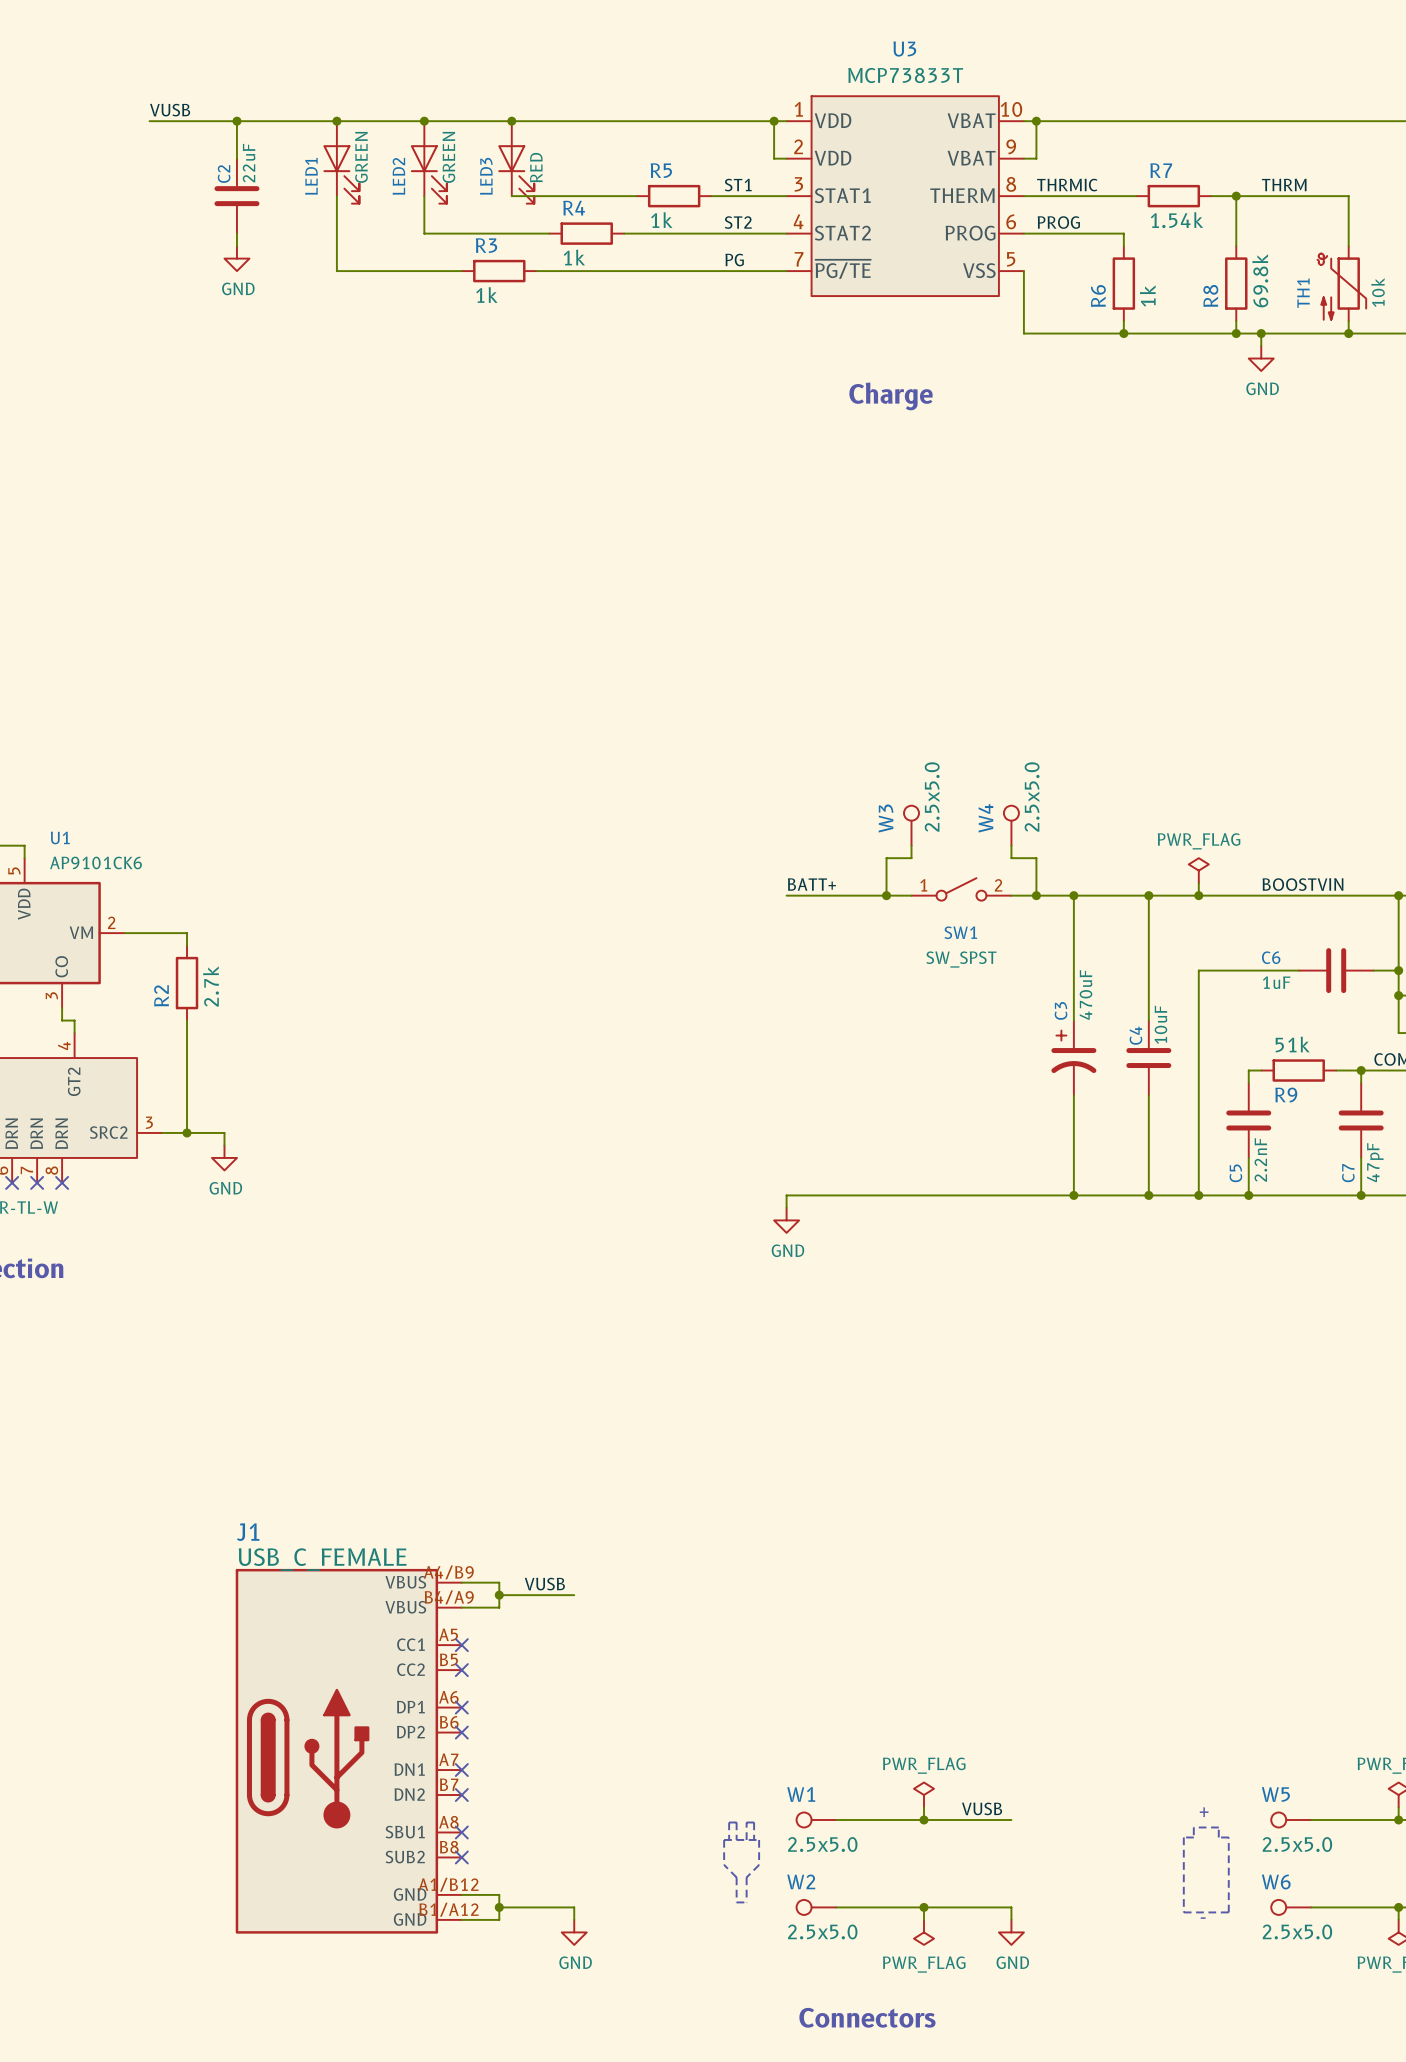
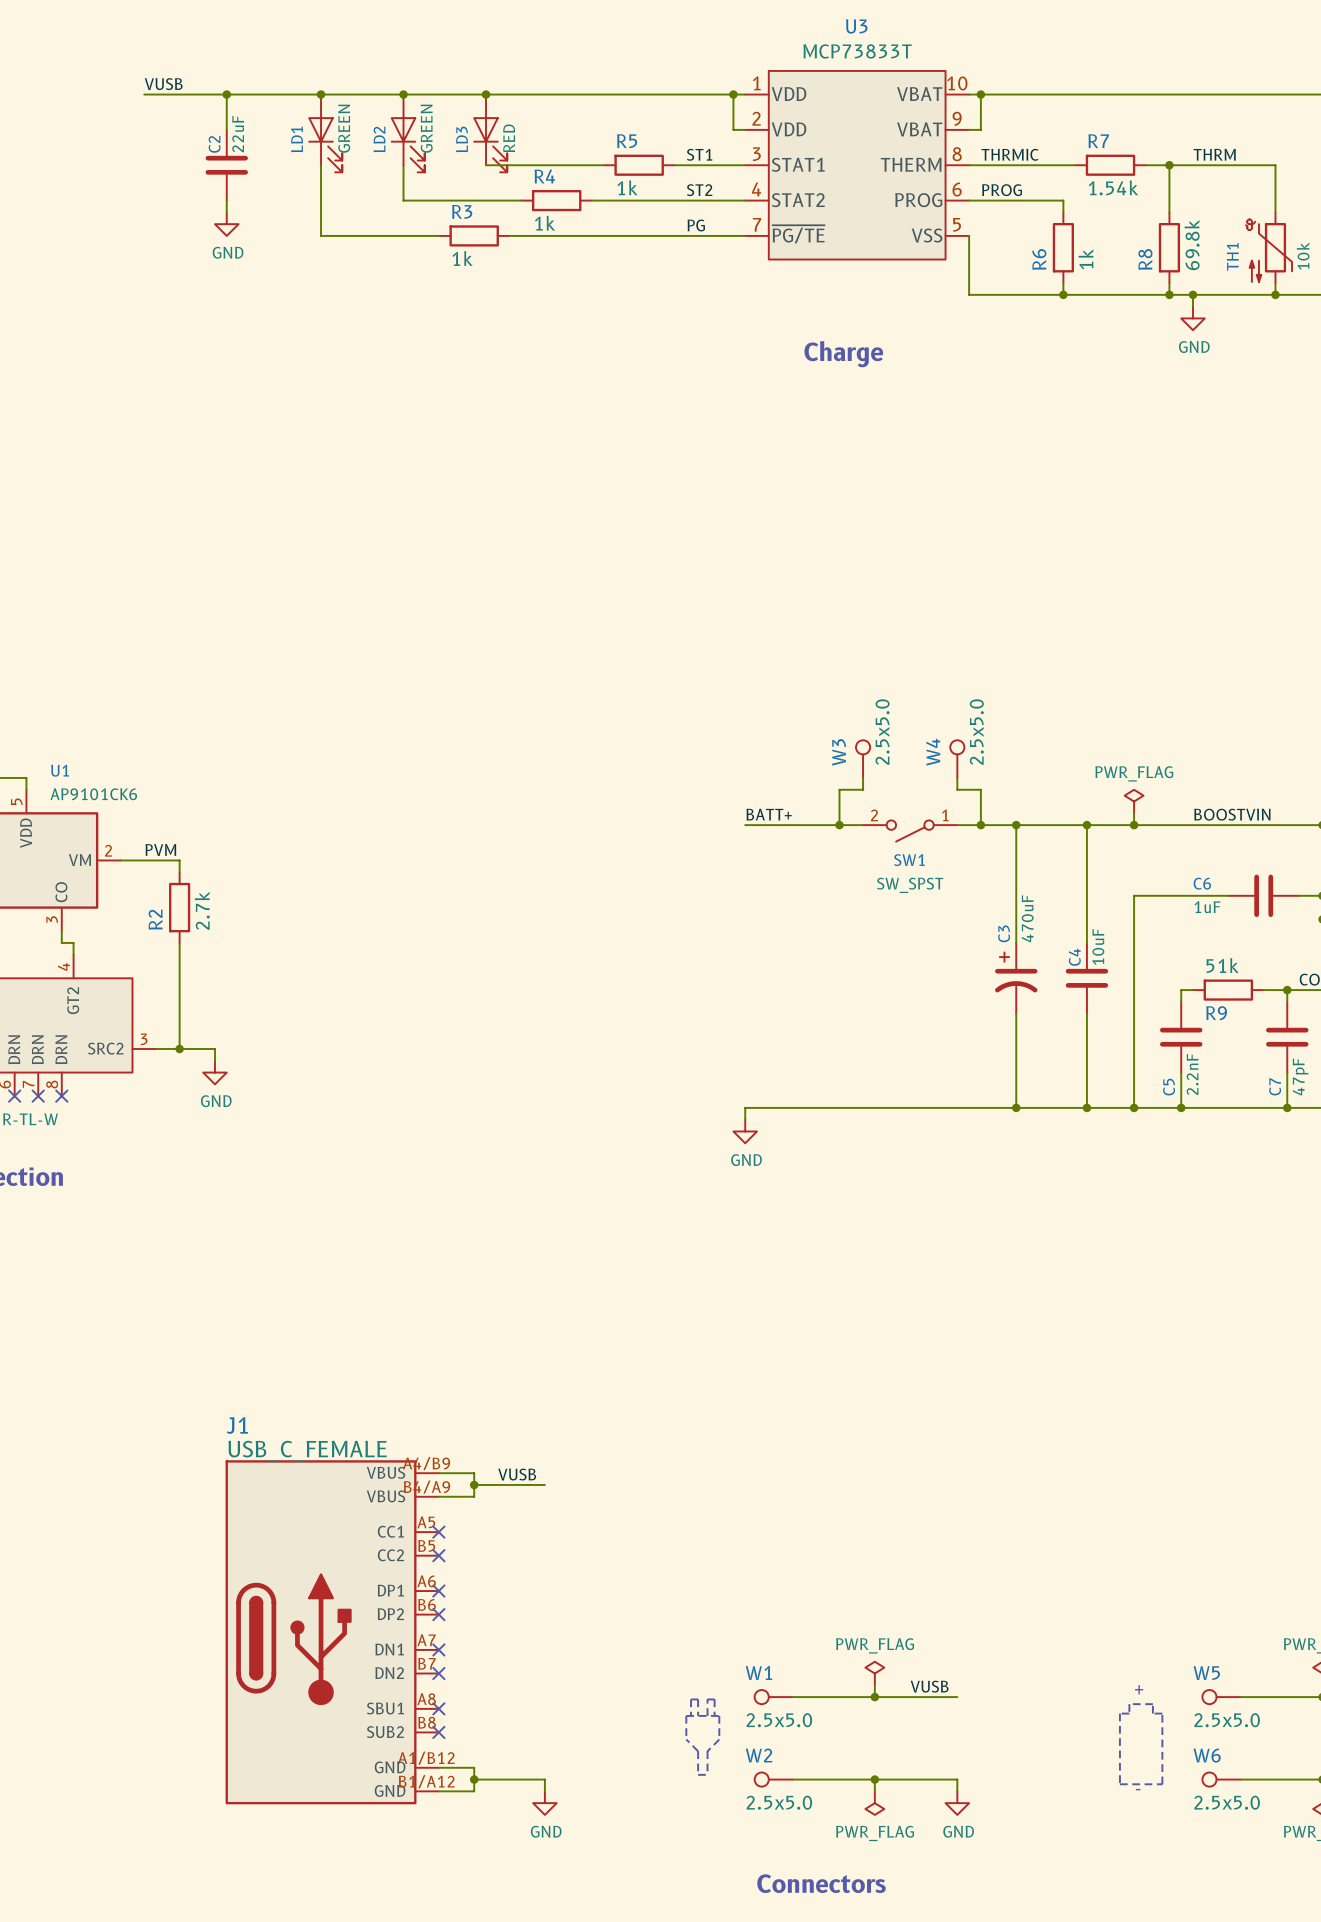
LED1 name: LED1 (311, 176) -> LD1 (297, 139)
LED2 name: LED2 (398, 176) -> LD2 (379, 139)
LED3 name: LED3 (486, 176) -> LD3 (461, 139)
SW1 rotation: 0° (961, 889) -> 180° (910, 831)
label: none -> PVM (160, 850)

